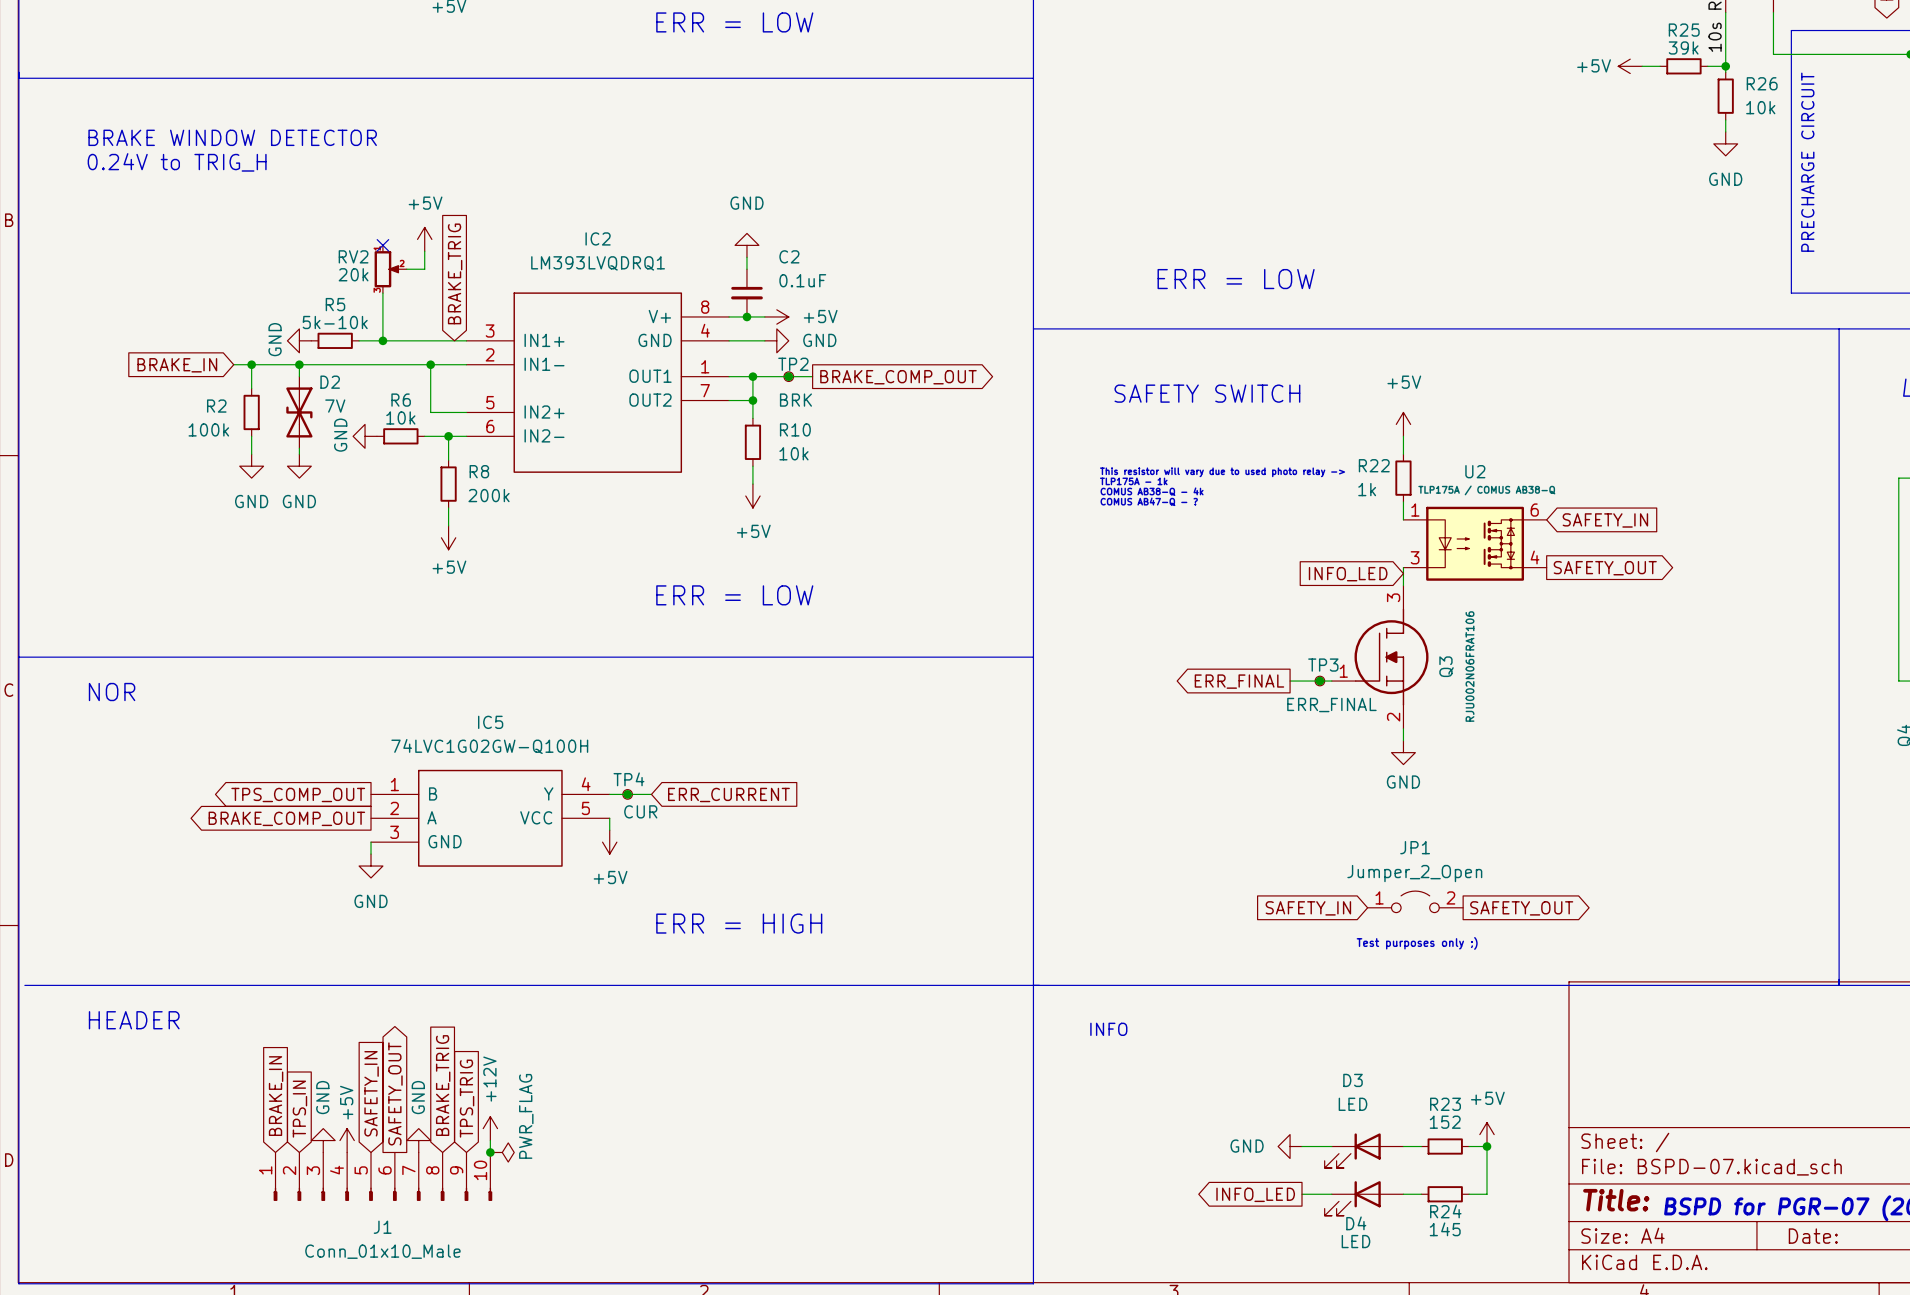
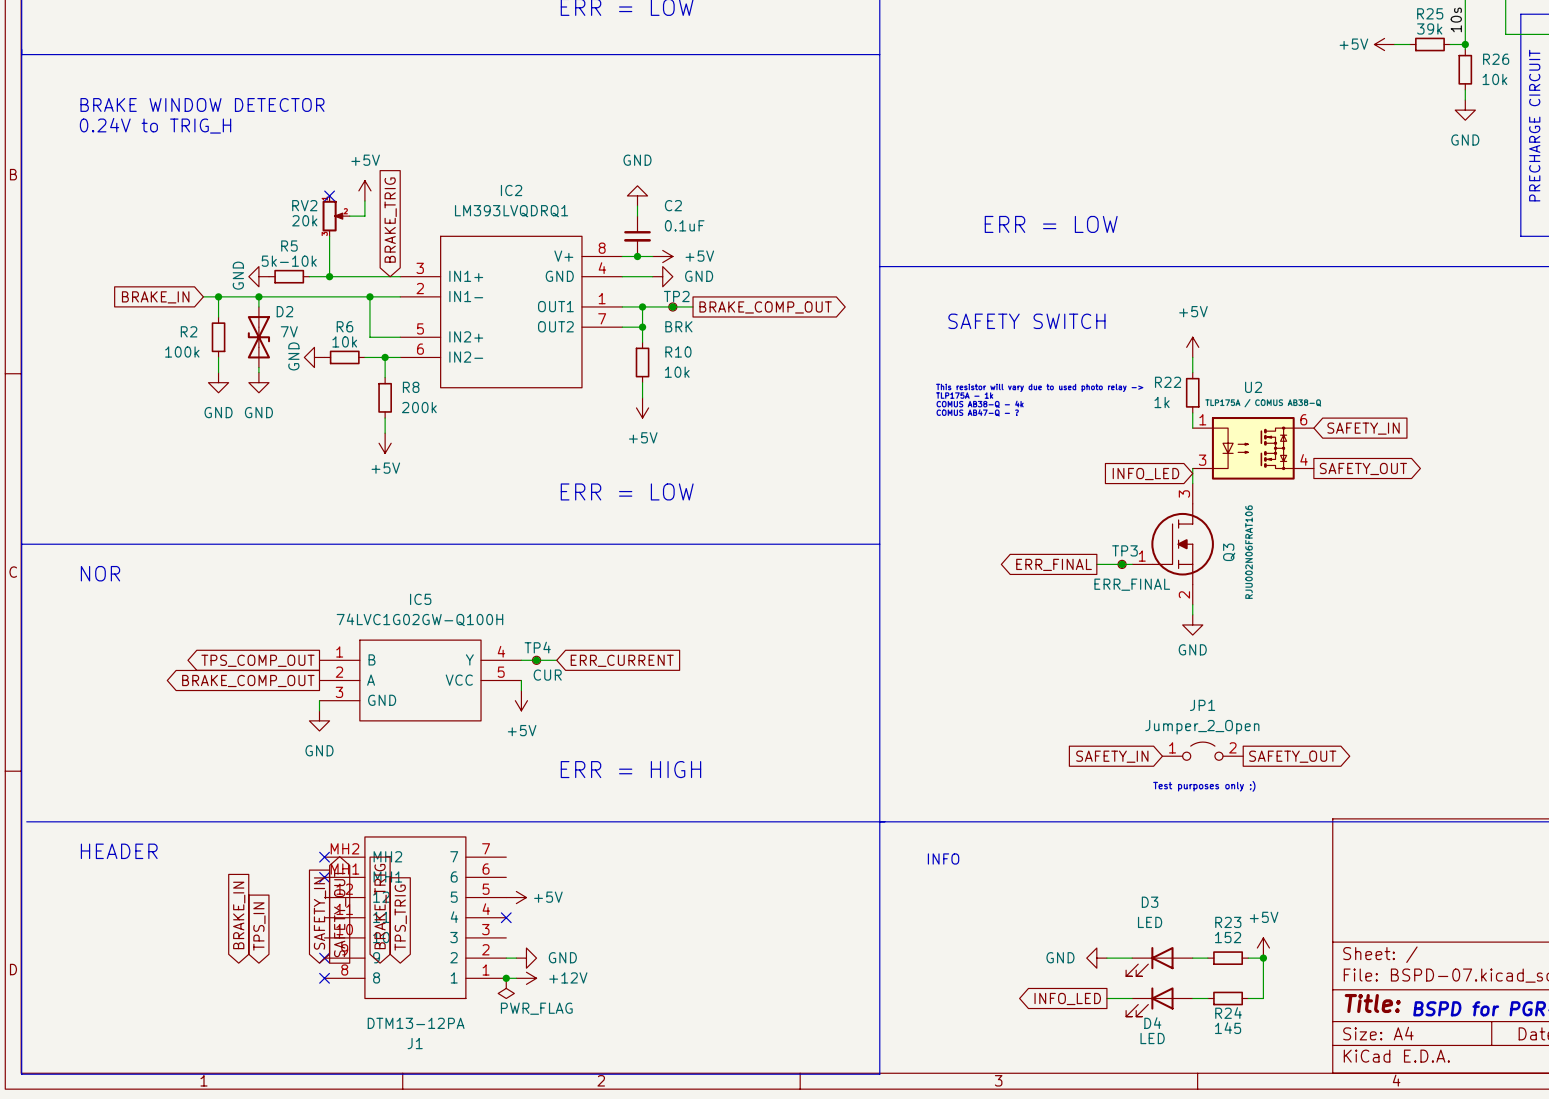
no-connect mark: none -> (324, 857)
no-connect mark: none -> (324, 877)
power symbol: none -> +5V (516, 897)
no-connect mark: none -> (506, 917)
power symbol rotation: 0° (490, 1128) -> 90° clockwise (526, 978)
power symbol position: +12V (490, 1128) -> +12V (526, 978)
power symbol: GND (323, 1140) -> none
power symbol: +5V (347, 1140) -> none
power symbol: GND (418, 1140) -> none
wire: (490, 1140) (490, 1152) -> none
no-connect mark: none -> (324, 958)
wire: none -> (506, 958) (516, 958)
power symbol: none -> GND (526, 958)
J1 symbol: [273, 1152, 493, 1201] -> [324, 836, 507, 1000]
junction: (490, 1152) -> none
power symbol rotation: 0° (502, 1152) -> 90° clockwise (506, 988)
power symbol position: PWR_FLAG (502, 1152) -> PWR_FLAG (506, 988)
no-connect mark: none -> (324, 978)
wire: none -> (506, 978) (516, 978)
junction: none -> (506, 978)
J1 name position: J1 (382, 1227) -> J1 (415, 1043)
J1 value: Conn_01x10_Male (382, 1251) -> DTM13-12PA (416, 1023)

